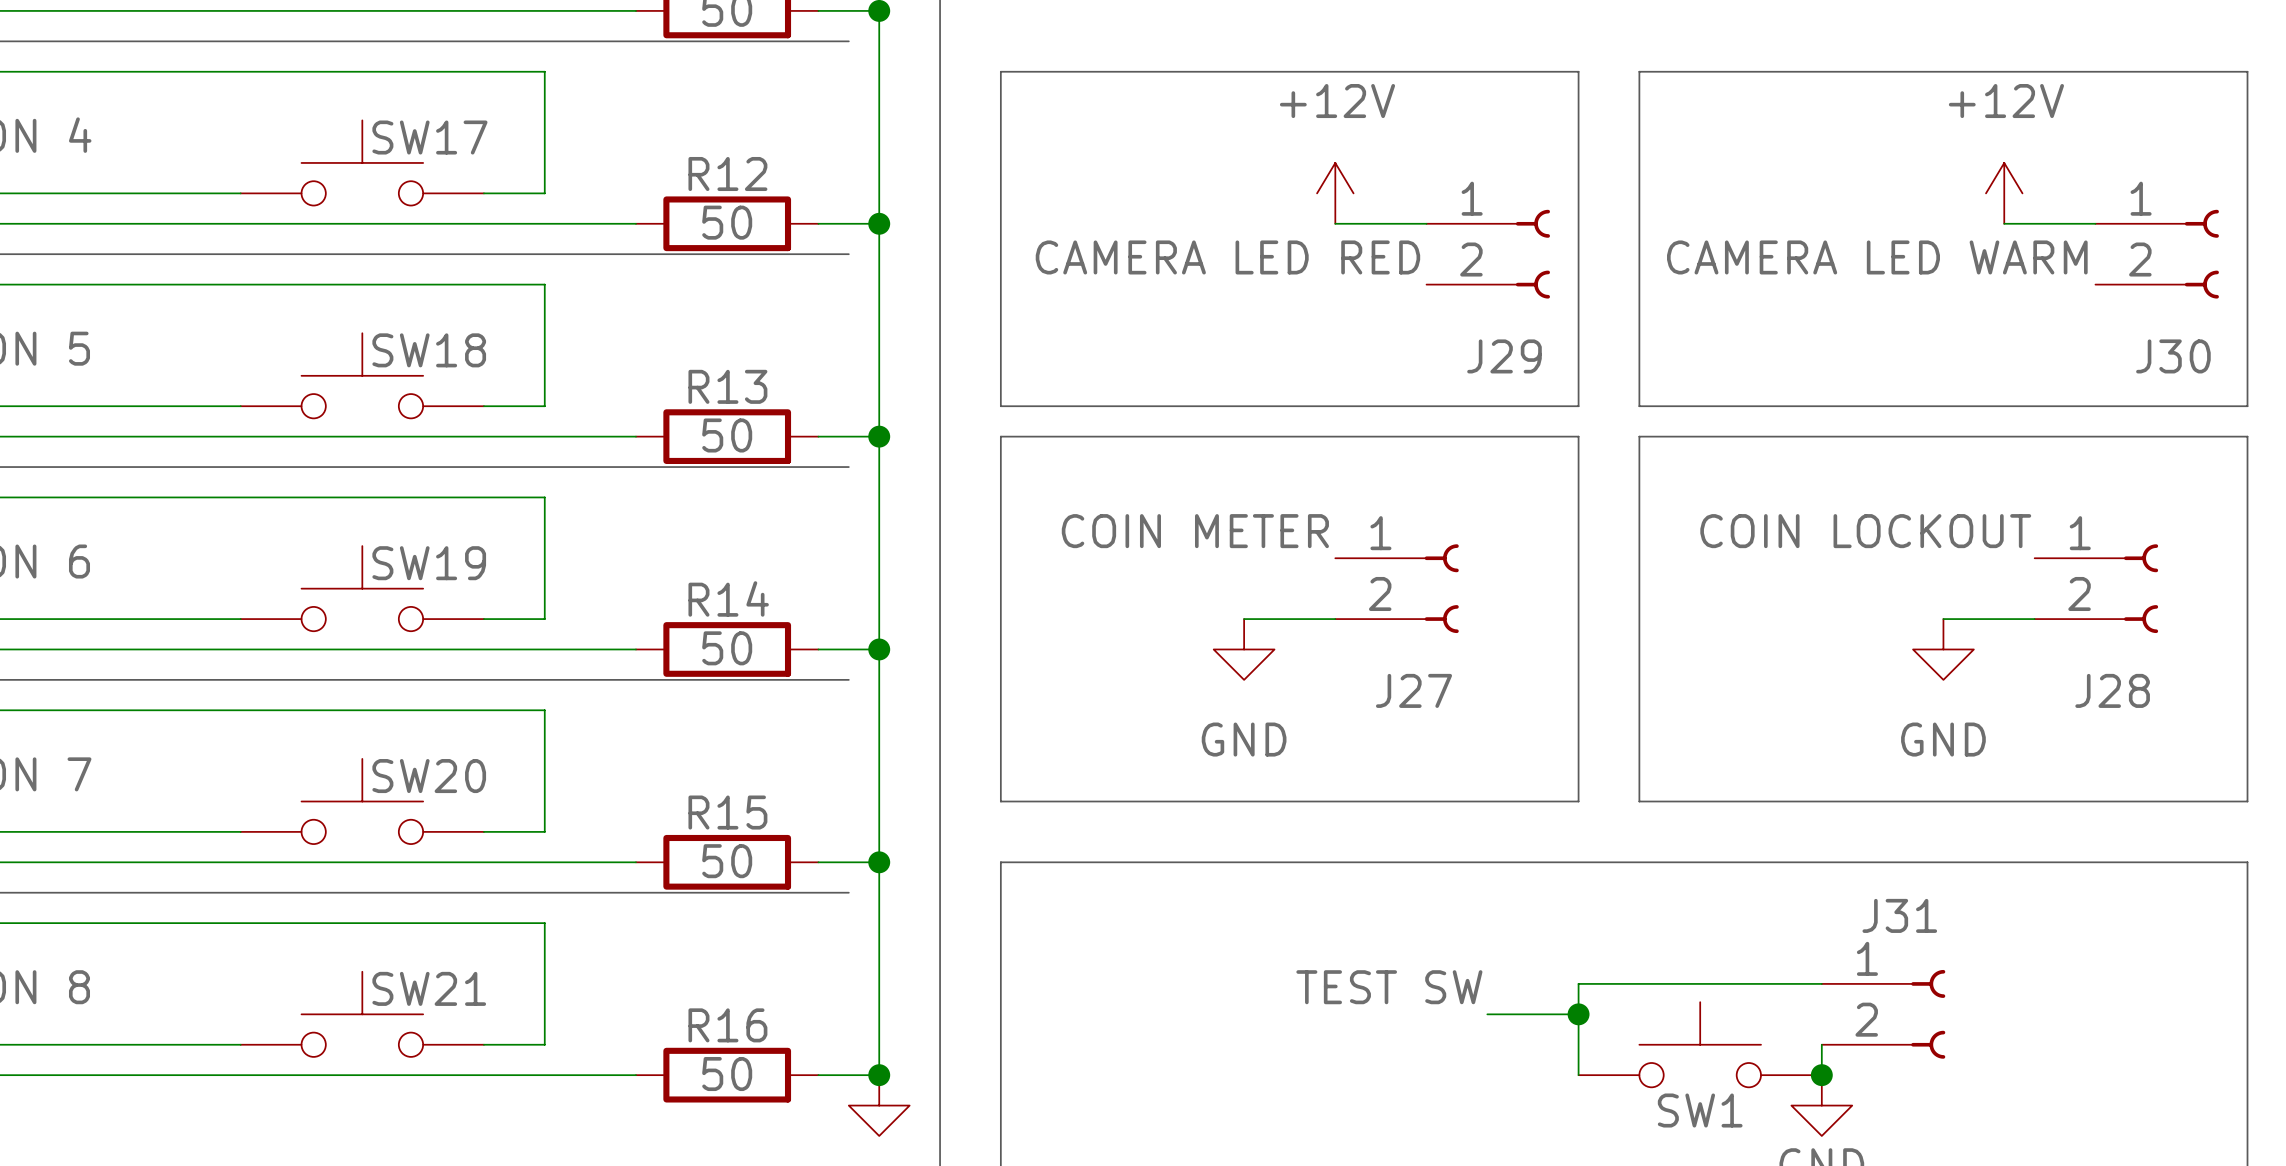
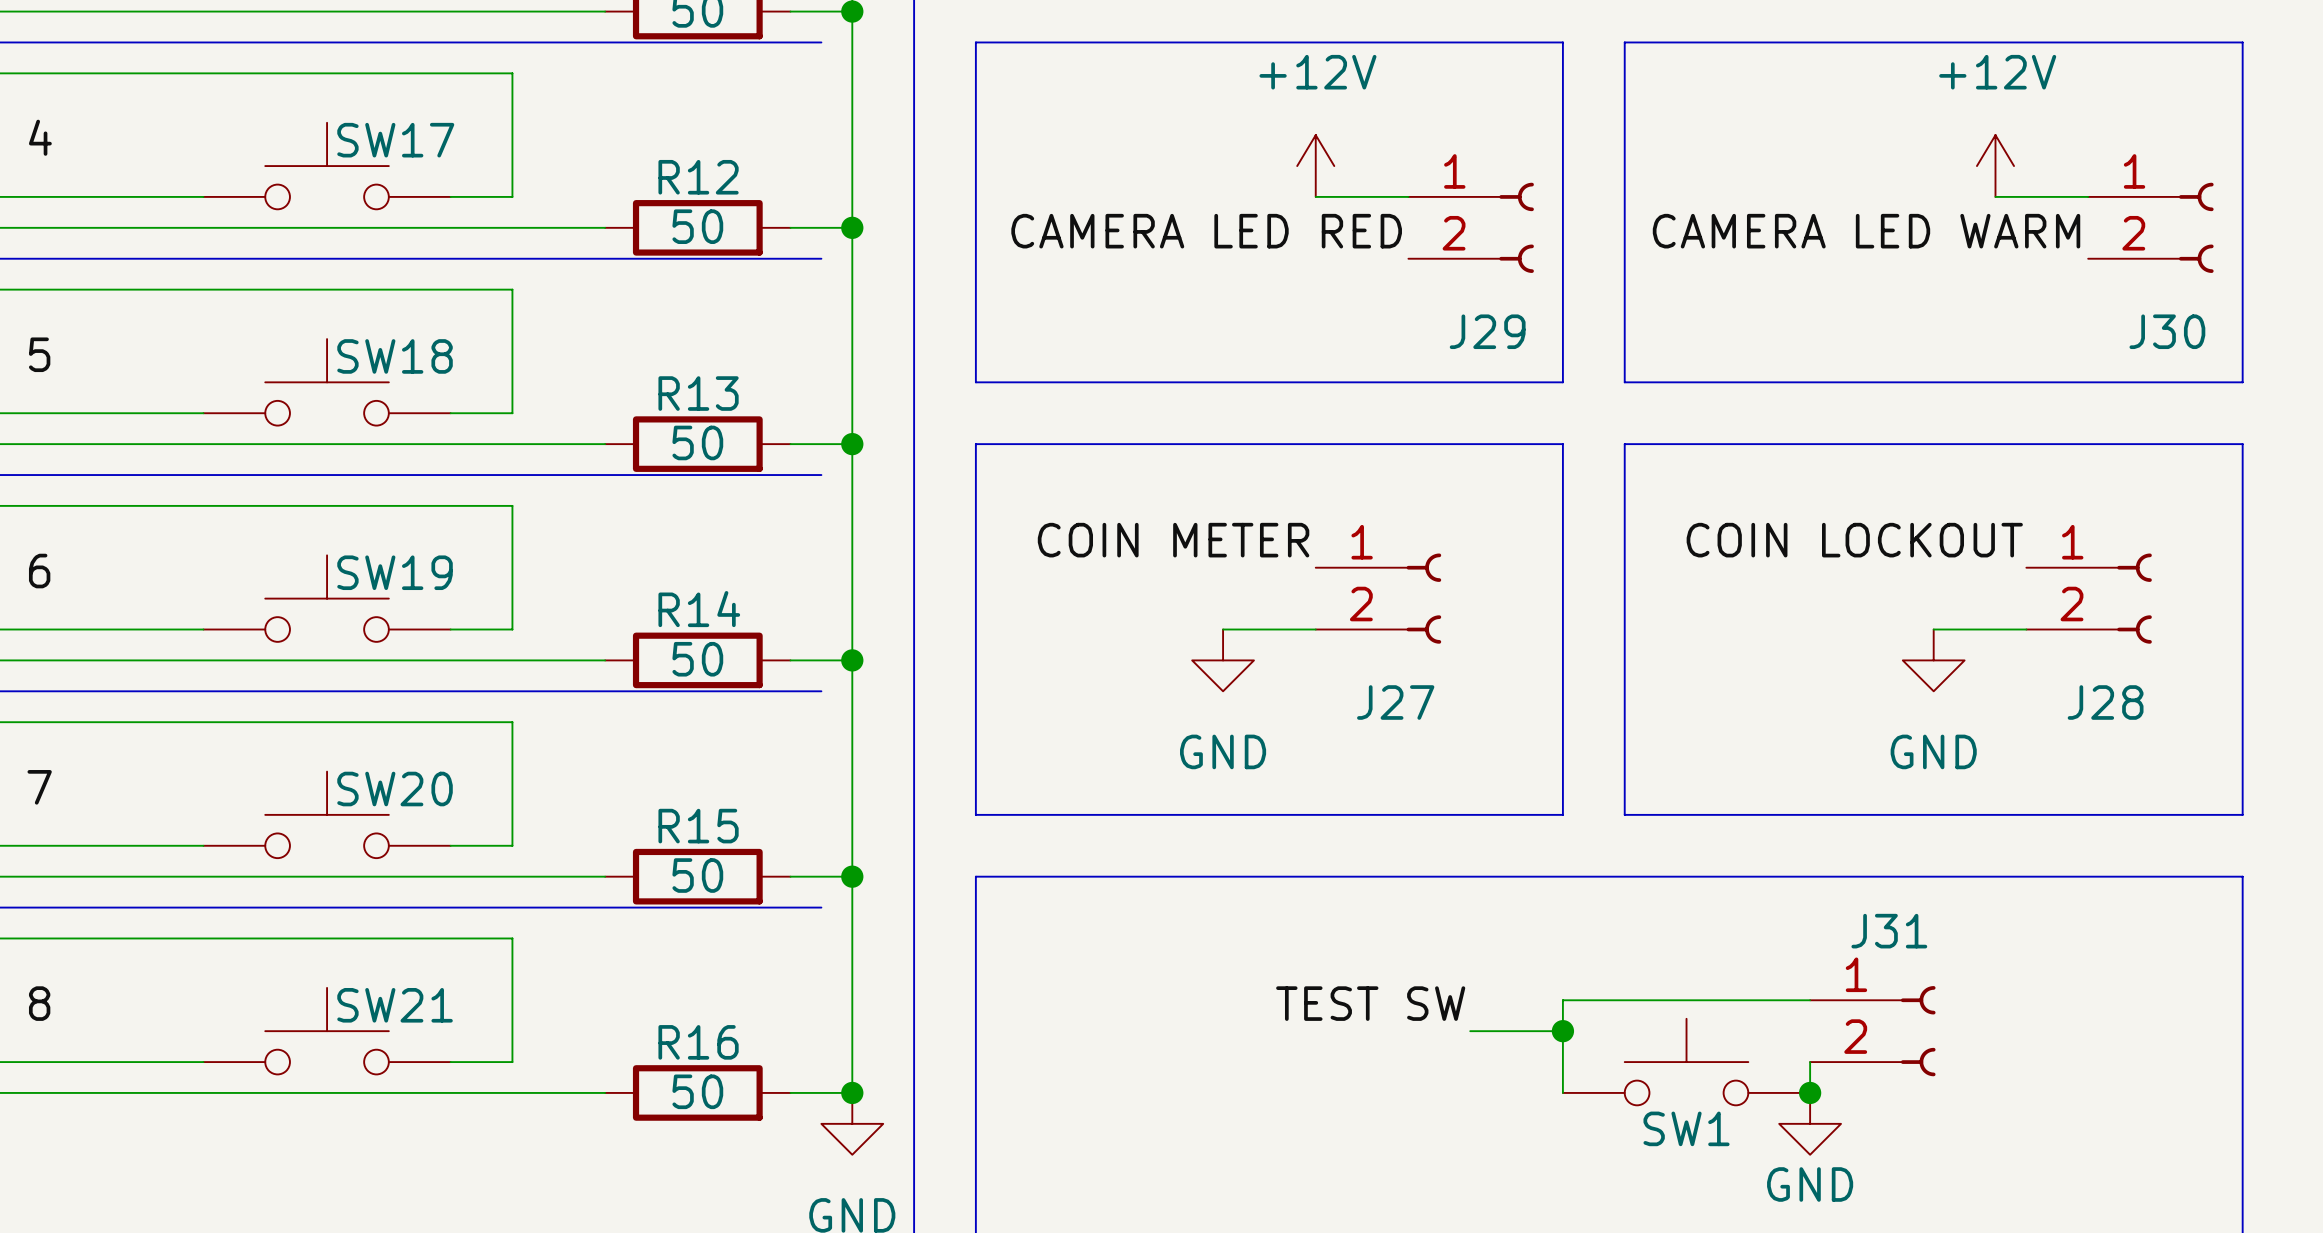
line: (1000, 71) (1578, 71) -> (975, 73) (975, 42) (1562, 42) (1562, 73)
line: (1639, 71) (2247, 71) -> (1624, 73) (1624, 42) (2242, 42) (2242, 73)
power symbol position: +12V (1335, 193) -> +12V (1315, 166)
power symbol position: +12V (2004, 193) -> +12V (1995, 166)
wire: (1335, 223) (1426, 223) -> (1315, 196) (1408, 196)
wire: (2004, 223) (2095, 223) -> (1995, 196) (2088, 196)
J29 position: (1488, 254) -> (1471, 227)
J30 position: (2157, 254) -> (2150, 227)
label position: CAMERA LED RED (1227, 257) -> CAMERA LED RED (1206, 231)
label position: CAMERA LED WARM (1877, 257) -> CAMERA LED WARM (1866, 231)
line: (1000, 375) (1000, 406) (1578, 406) (1578, 375) -> (975, 382) (1562, 382)
line: (1639, 375) (1639, 406) (2247, 406) (2247, 375) -> (1624, 382) (2242, 382)

